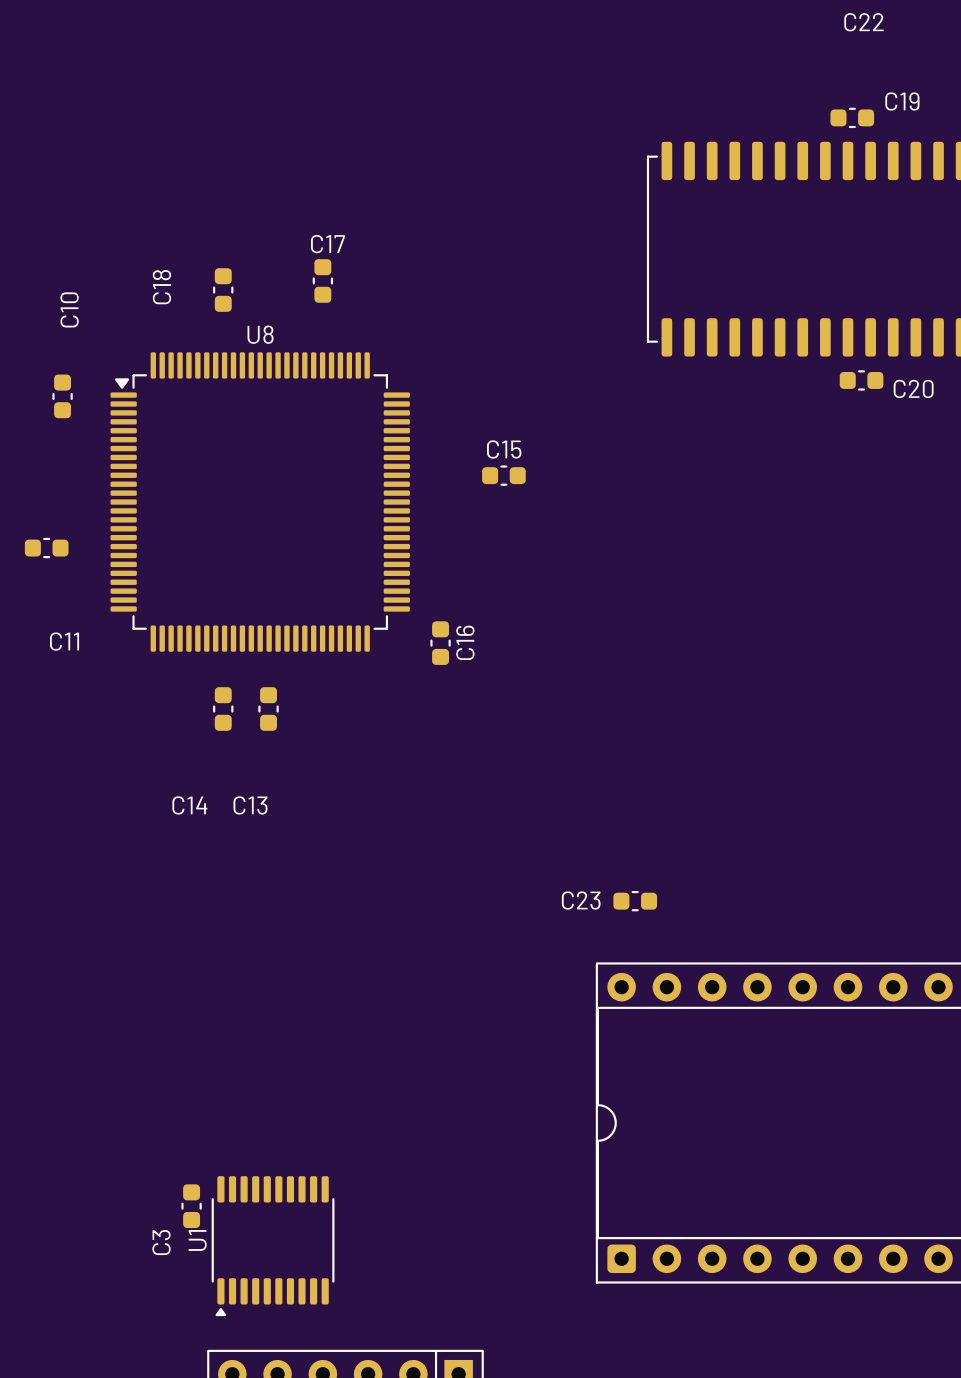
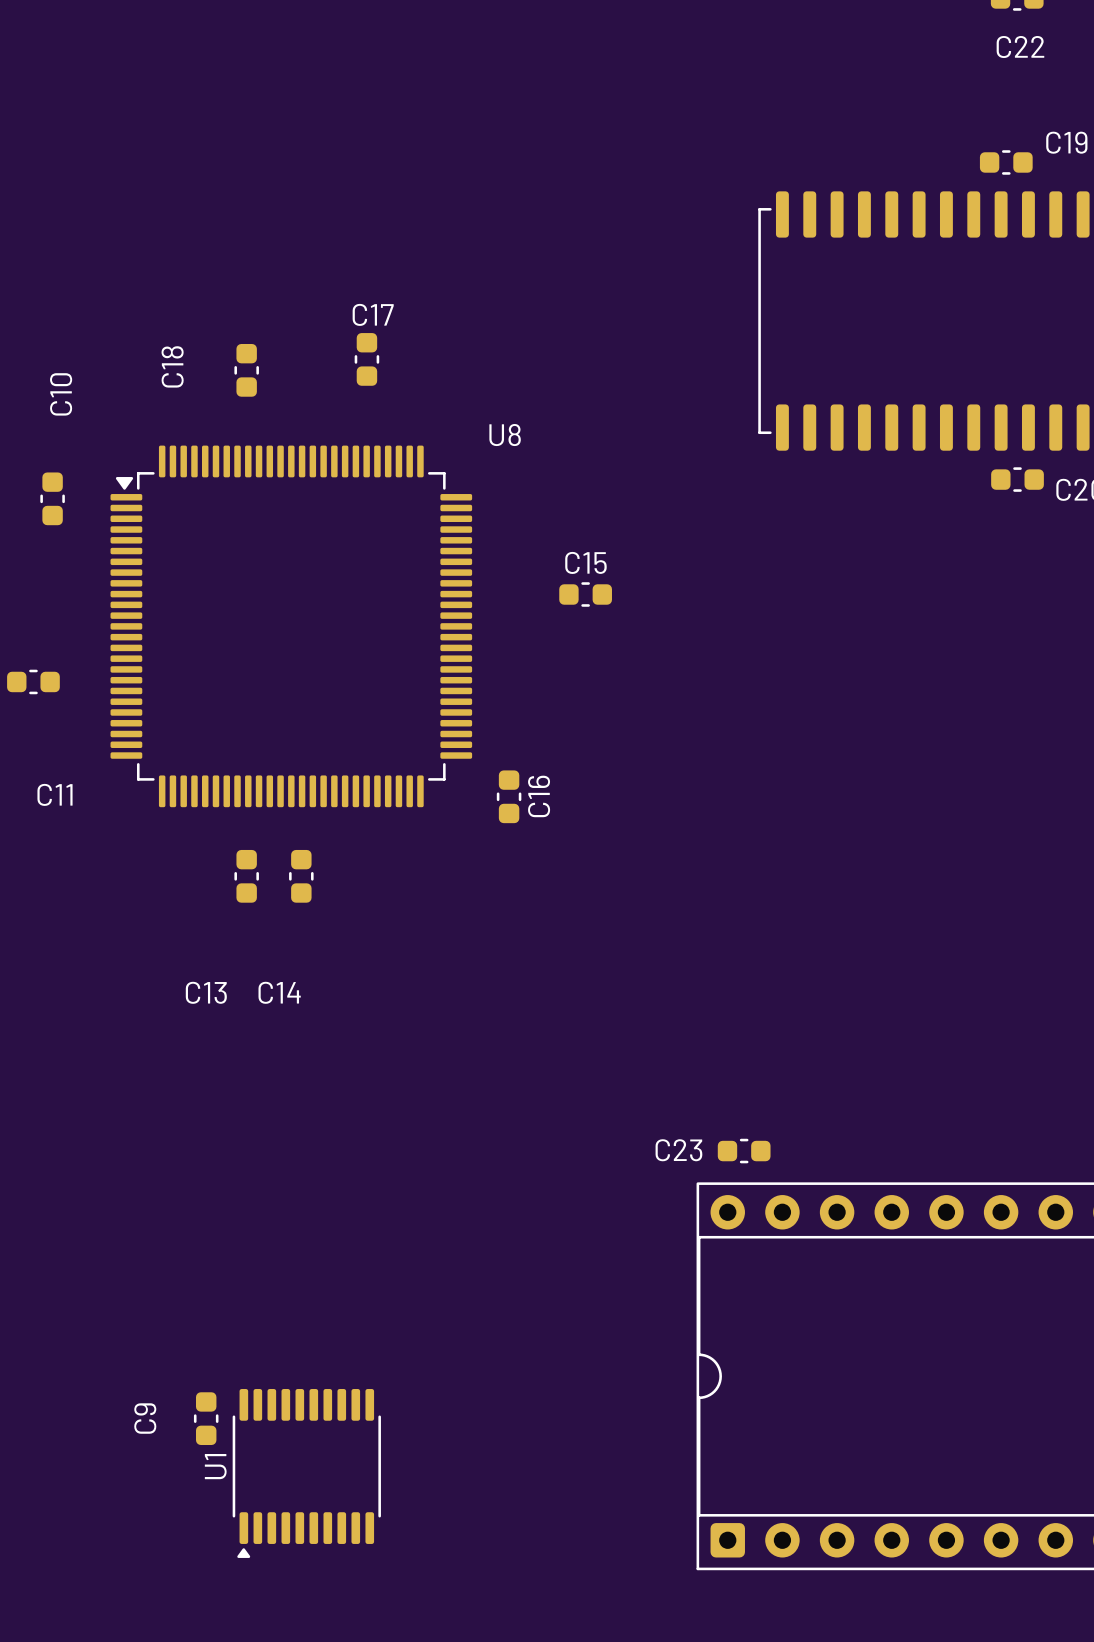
U8 name position: U8 (260, 334) -> U8 (505, 435)
C14 name: C14 (189, 805) -> C13 (206, 992)
C13 name: C13 (250, 805) -> C14 (279, 992)
C23 position: (635, 901) -> (744, 1151)
C9: none -> (206, 1418)
C3: (191, 1206) -> none
U1 position: (273, 1246) -> (306, 1473)

